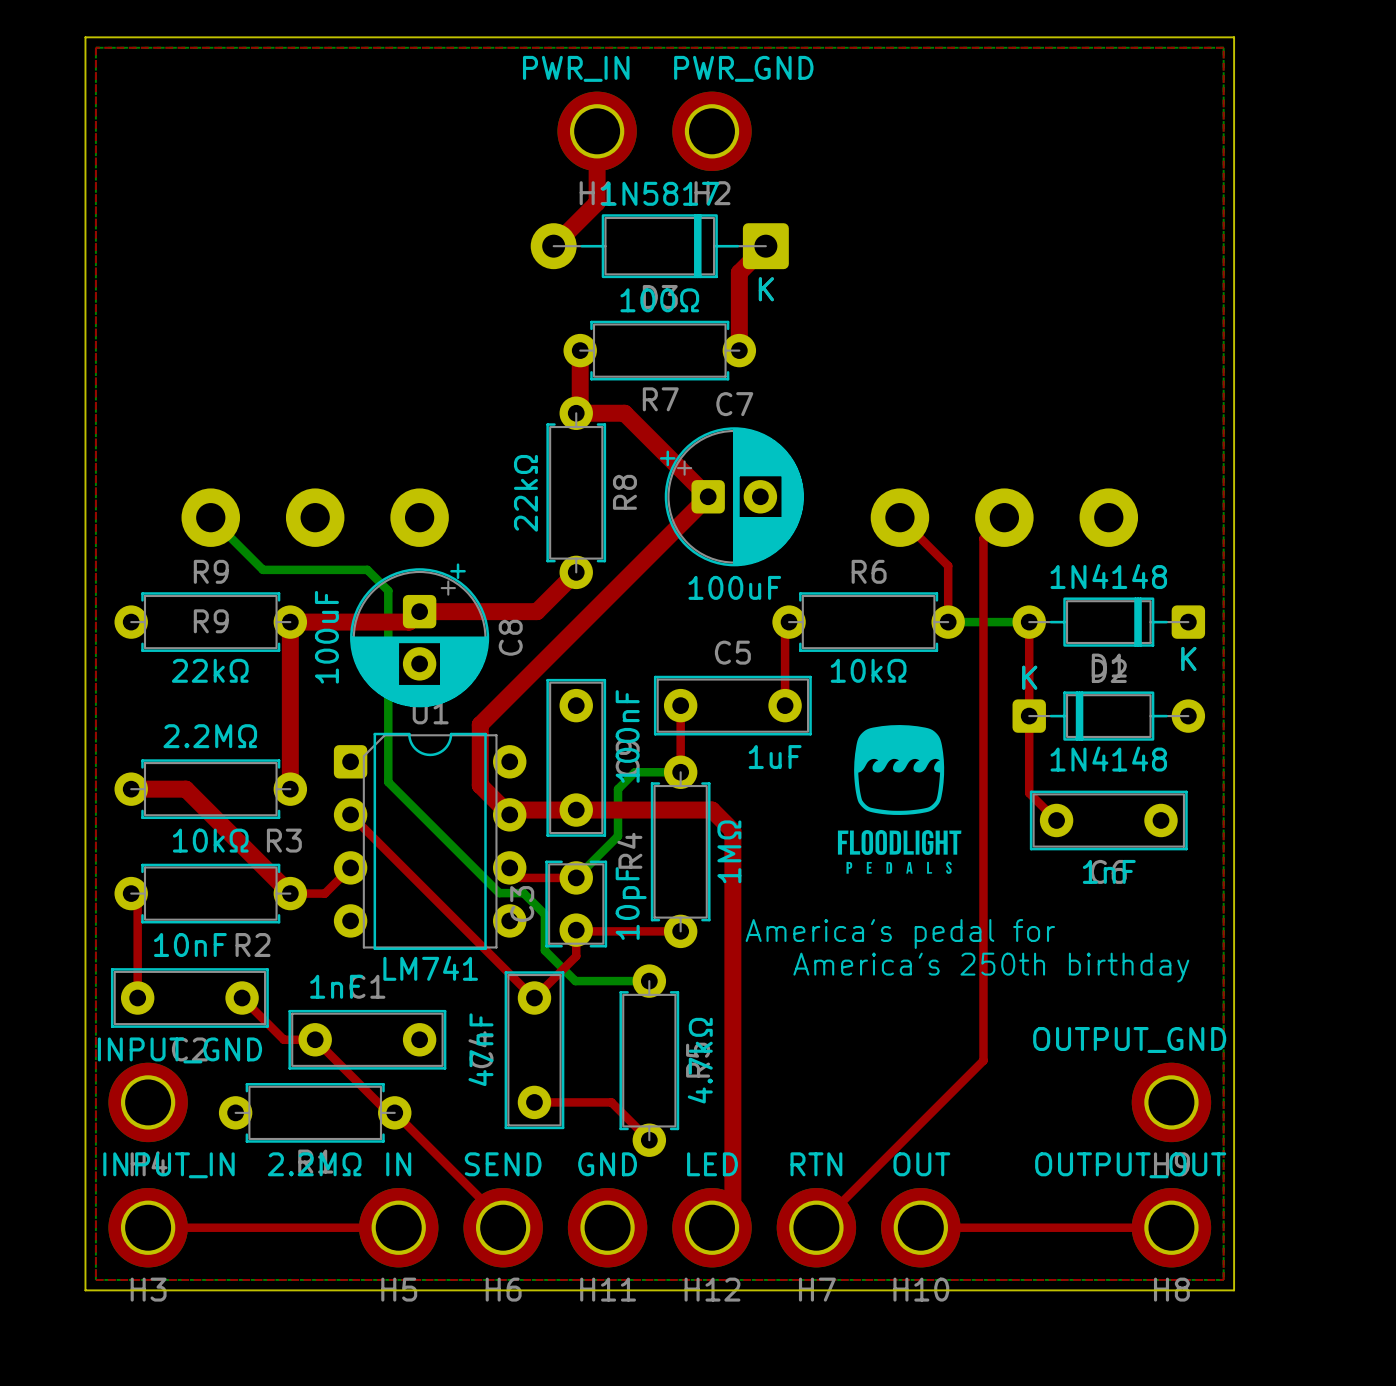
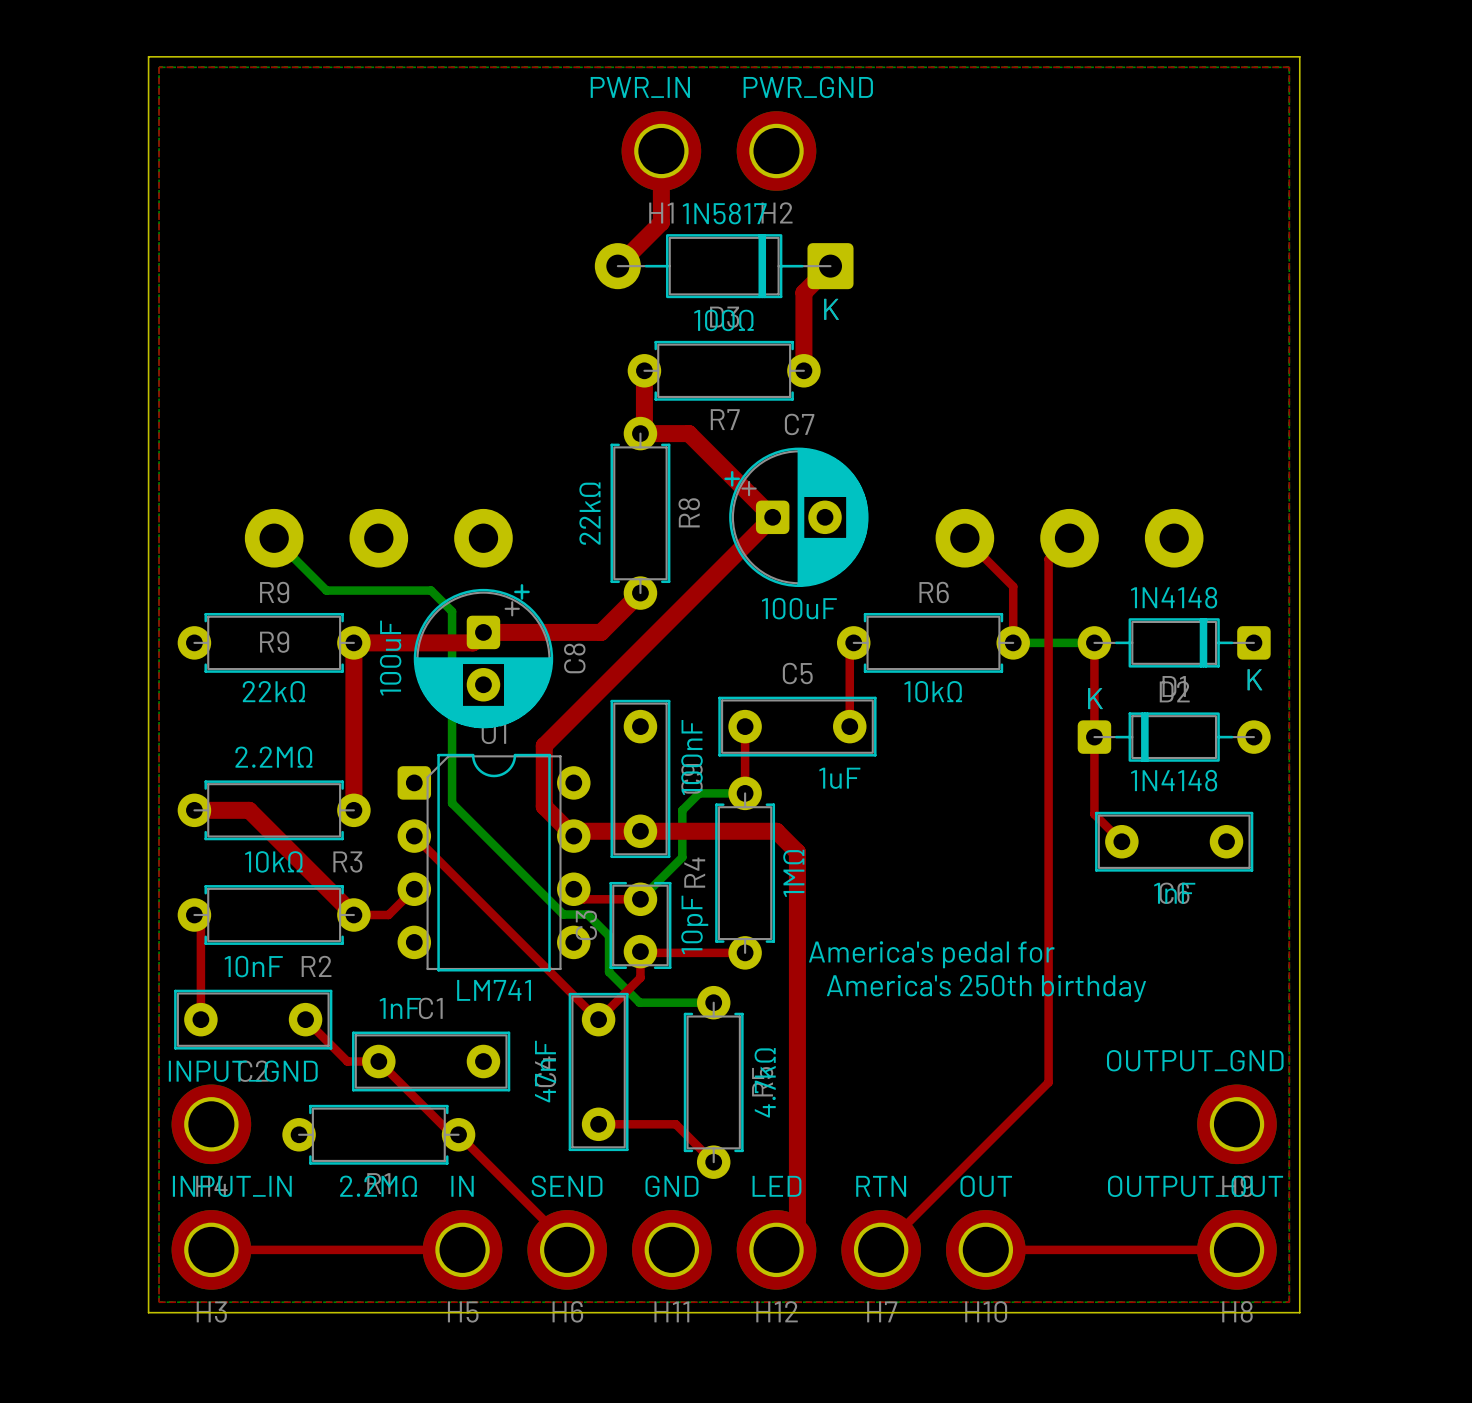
drawing: [837, 725, 962, 874] -> none

